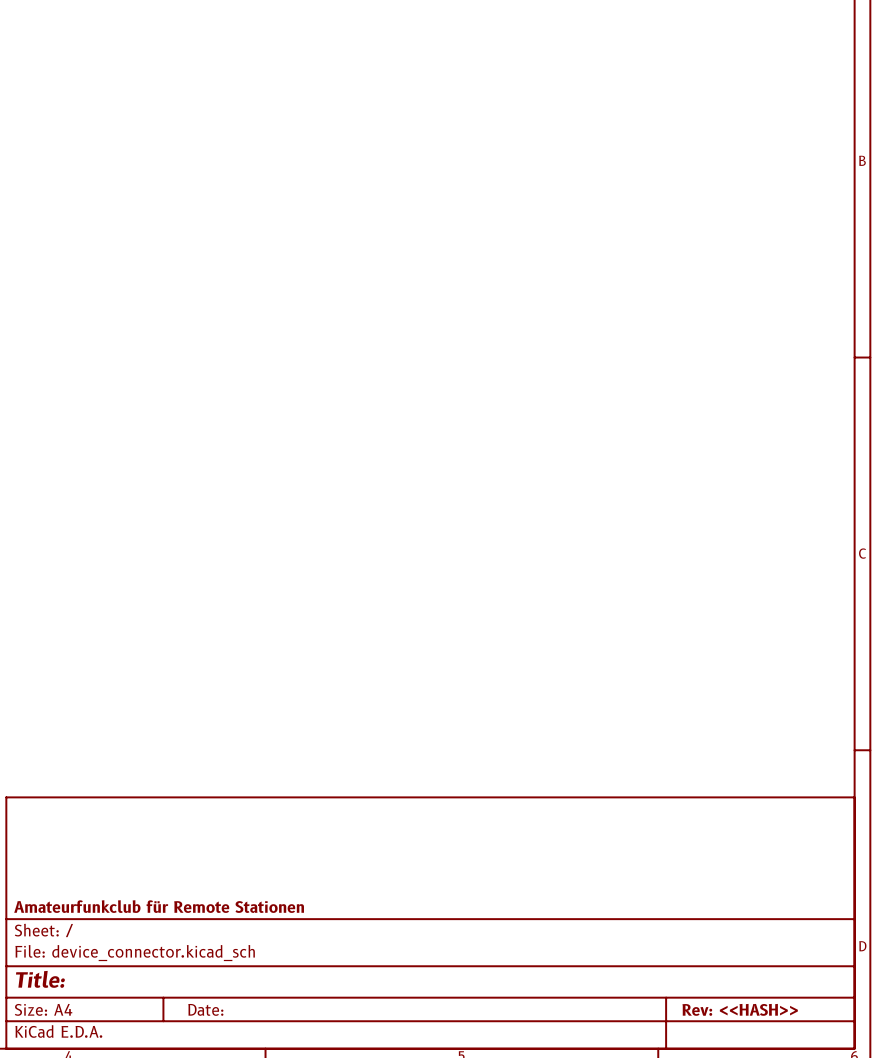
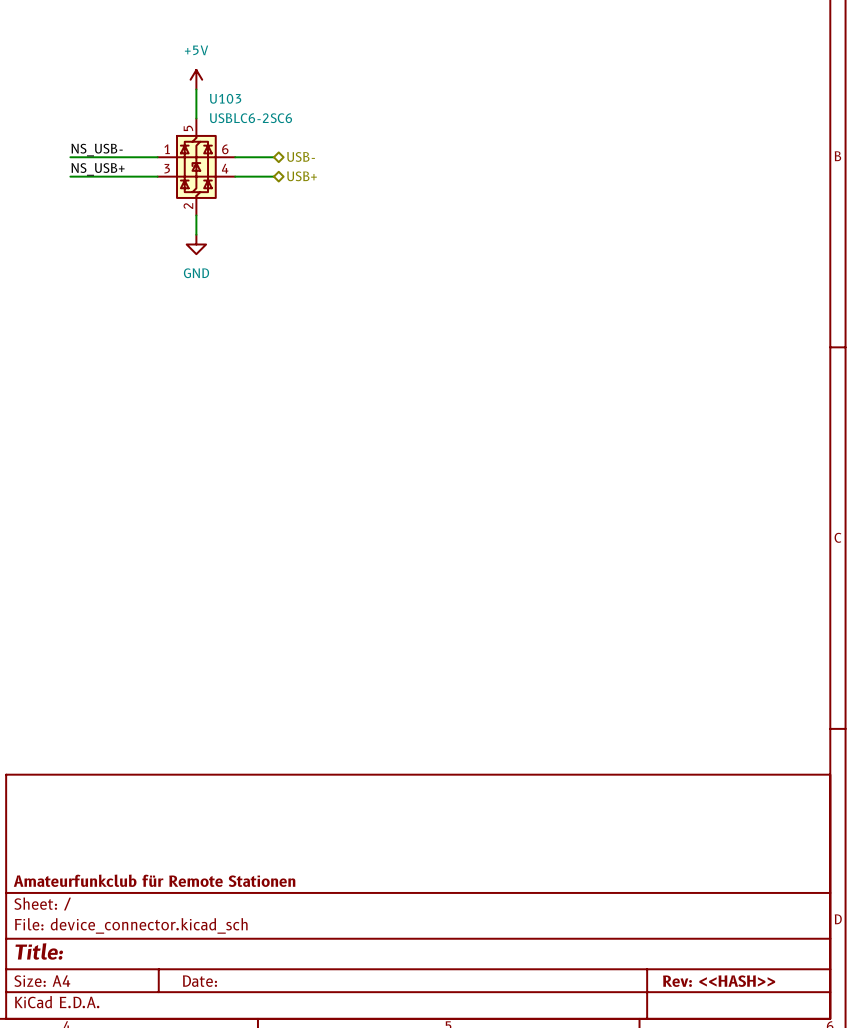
power symbol: none -> +5V (196, 79)
wire: none -> (196, 89) (196, 118)
label: none -> NS_USB- (97, 150)
wire: none -> (70, 157) (157, 157)
wire: none -> (235, 157) (273, 157)
hierarchical label: none -> USB- (301, 156)
U103: none -> USBLC6-2SC6 (196, 166)
label: none -> NS_USB+ (98, 169)
wire: none -> (70, 176) (157, 176)
wire: none -> (235, 176) (273, 176)
hierarchical label: none -> USB+ (302, 176)
wire: none -> (196, 215) (196, 234)
power symbol: none -> GND (196, 244)

